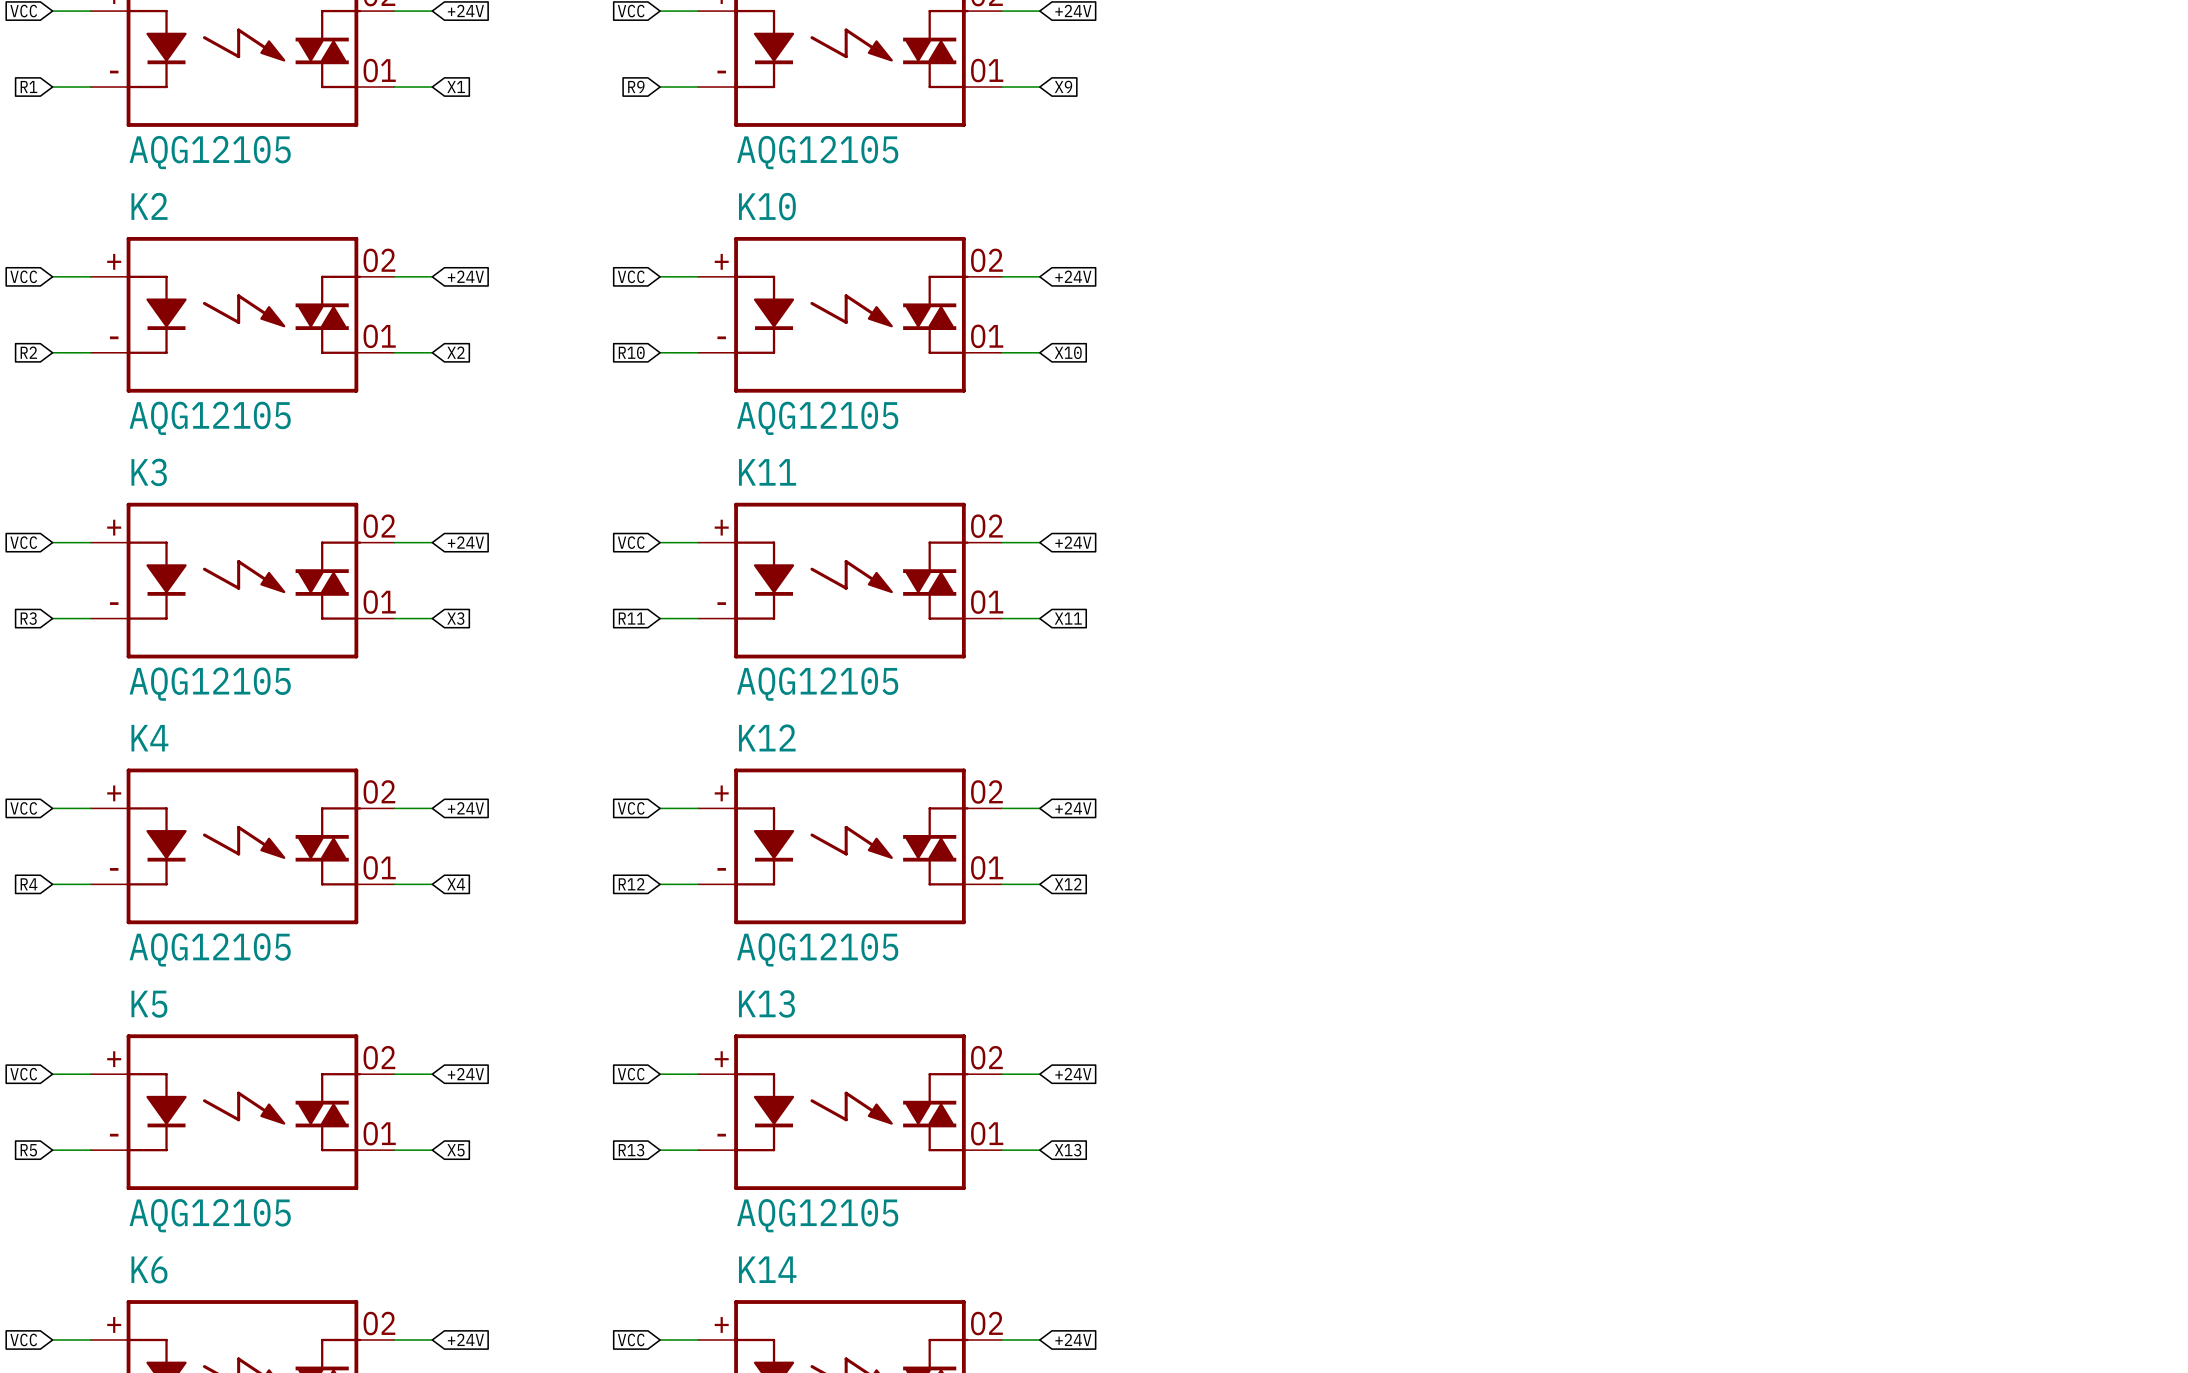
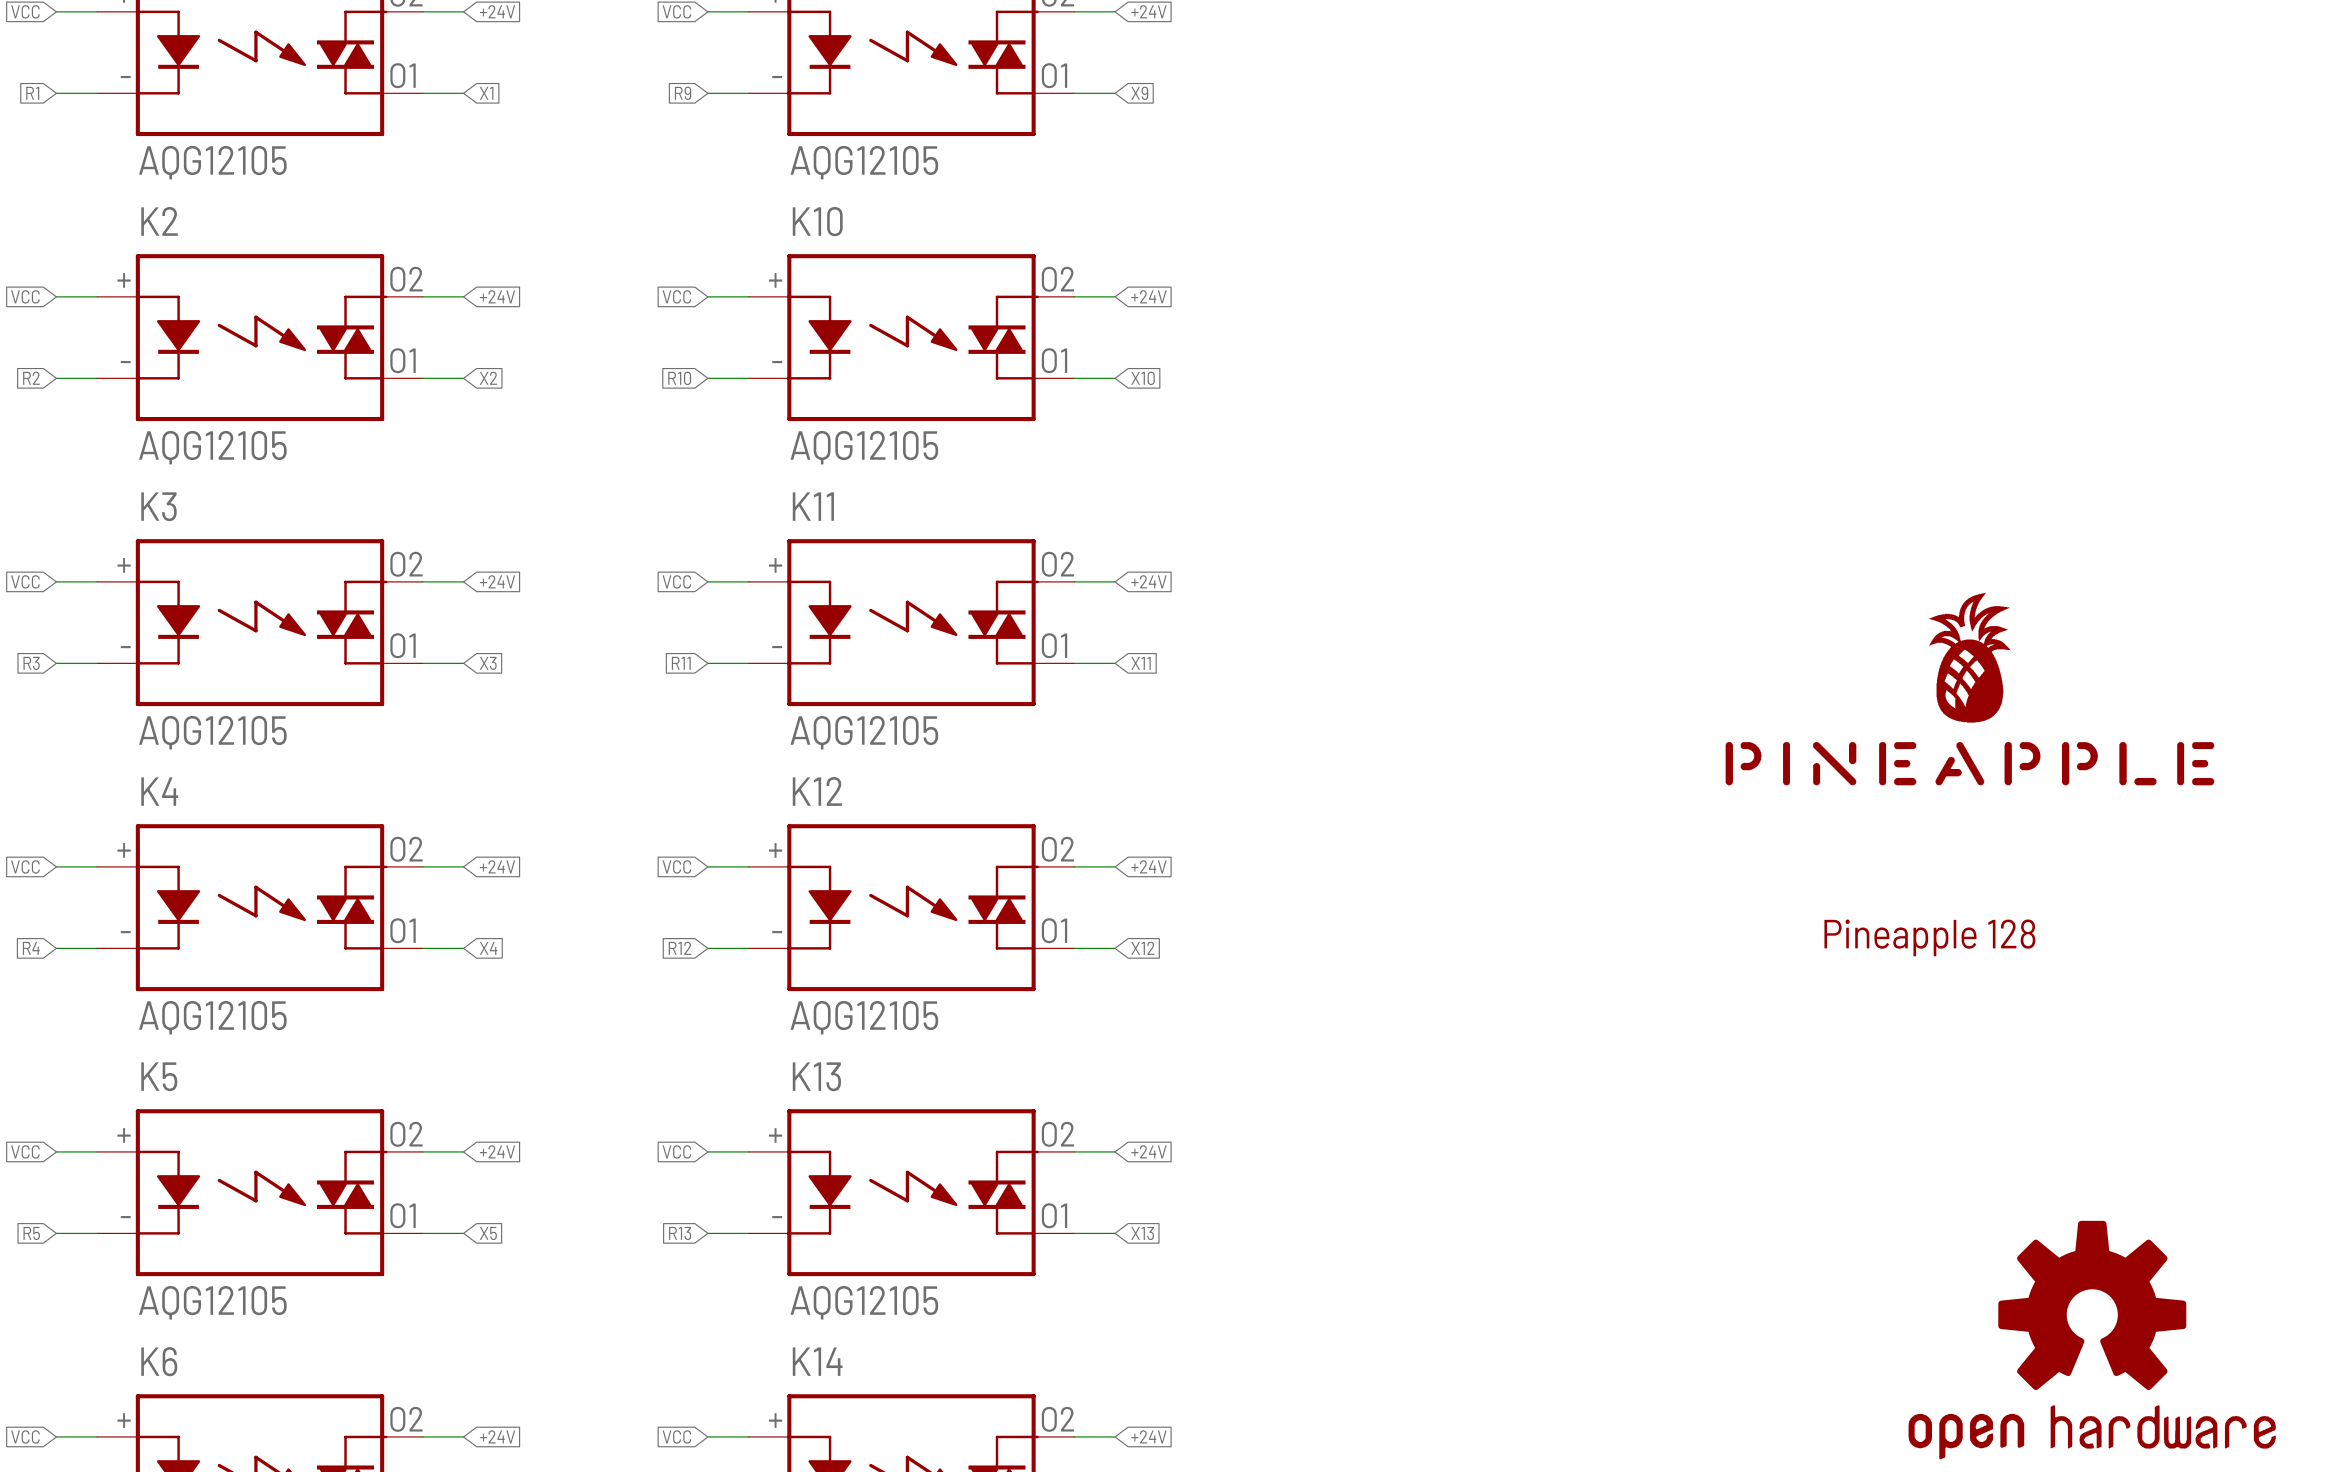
part: none -> (1969, 689)
text: none -> Pineapple 128 (1929, 937)
part: none -> (2092, 1340)

